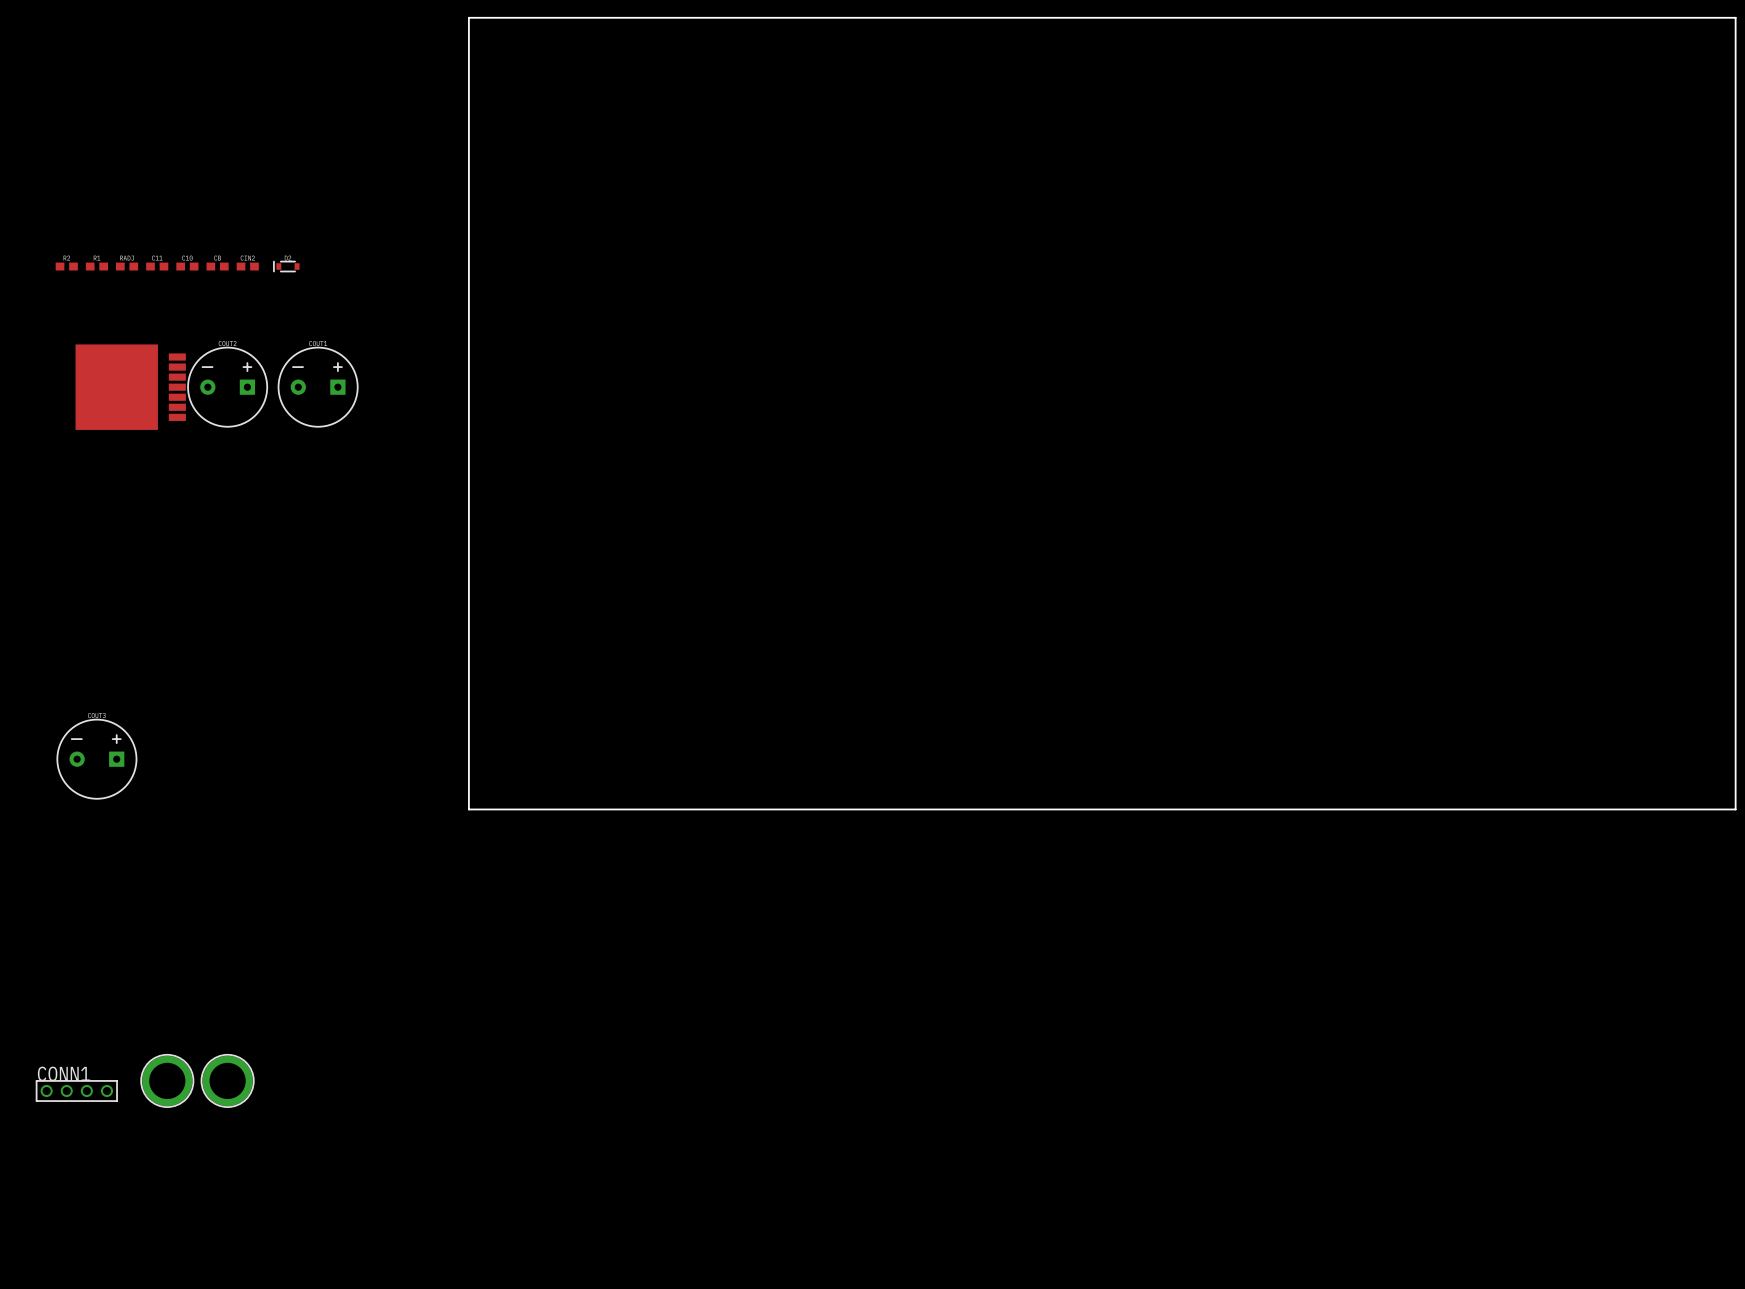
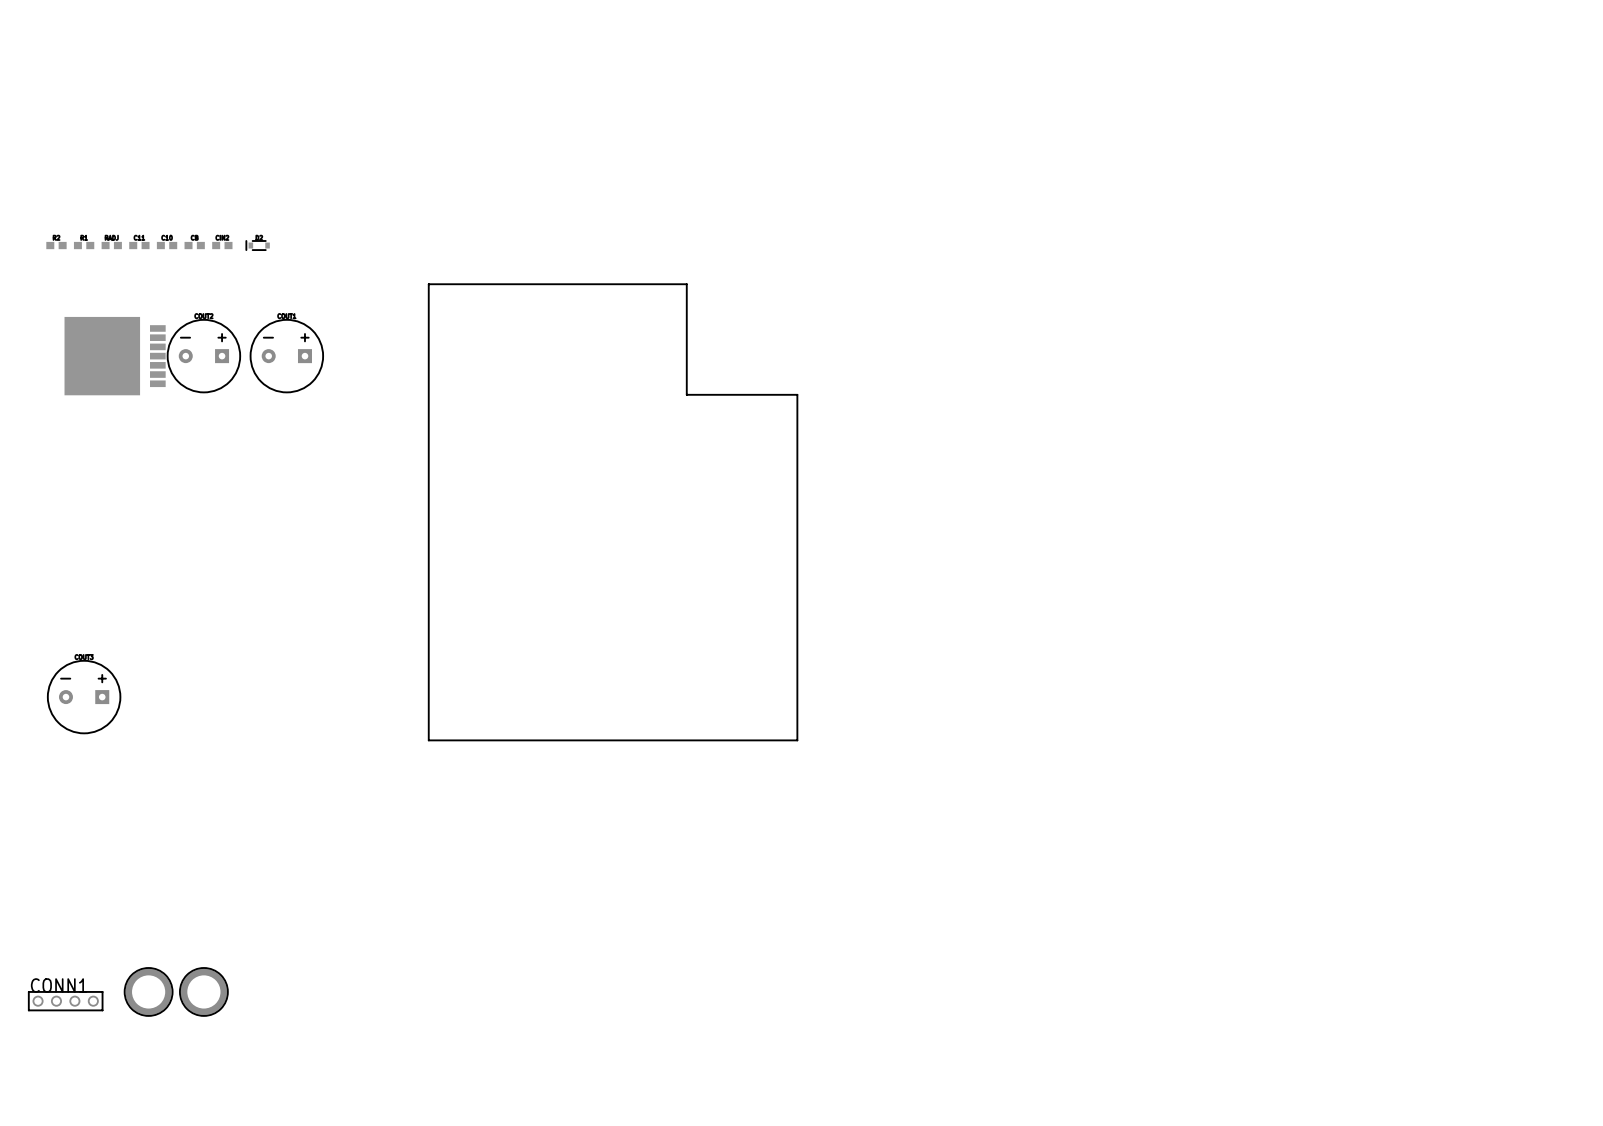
board edge: (468, 17) (1735, 17) (1735, 809) (468, 809) (468, 17) -> none
board edge: none -> (428, 284) (686, 284) (686, 394) (797, 394) (797, 740) (428, 740) (428, 284)

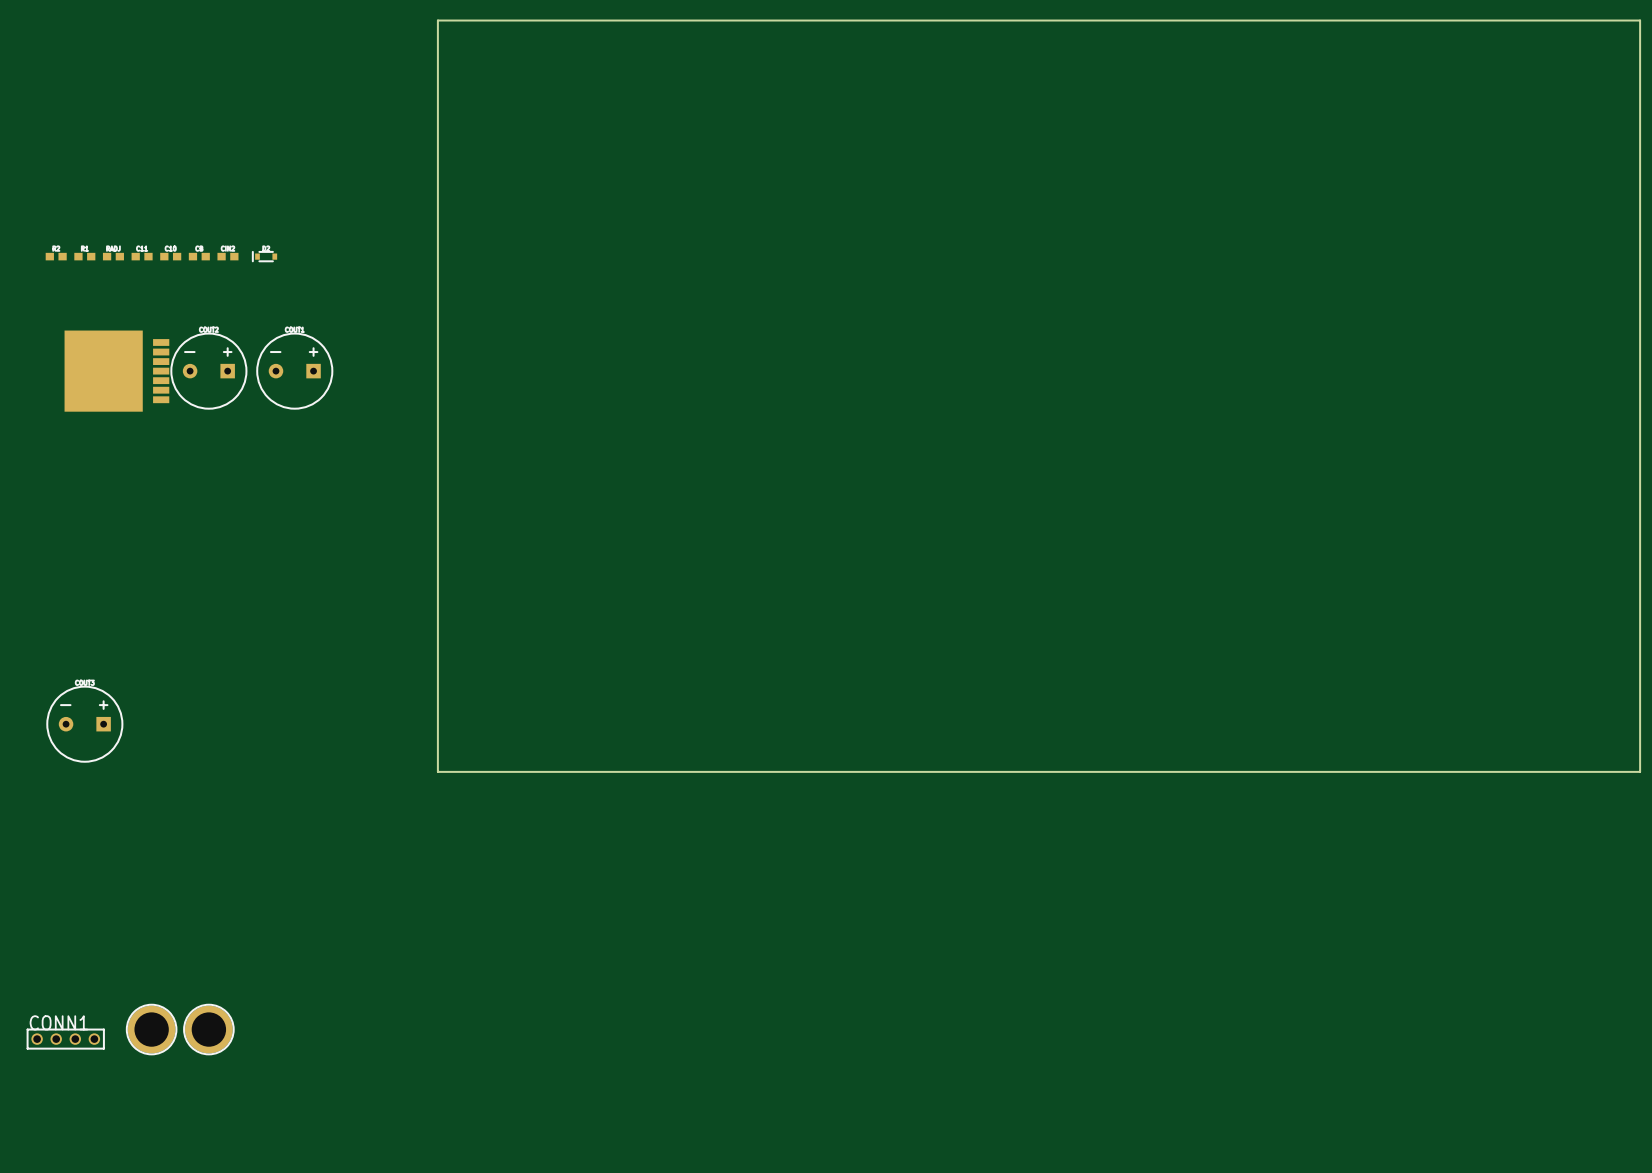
board edge: none -> (437, 20) (1640, 20) (1640, 771) (437, 771) (437, 20)
board edge: (428, 284) (686, 284) (686, 394) (797, 394) (797, 740) (428, 740) (428, 284) -> none

